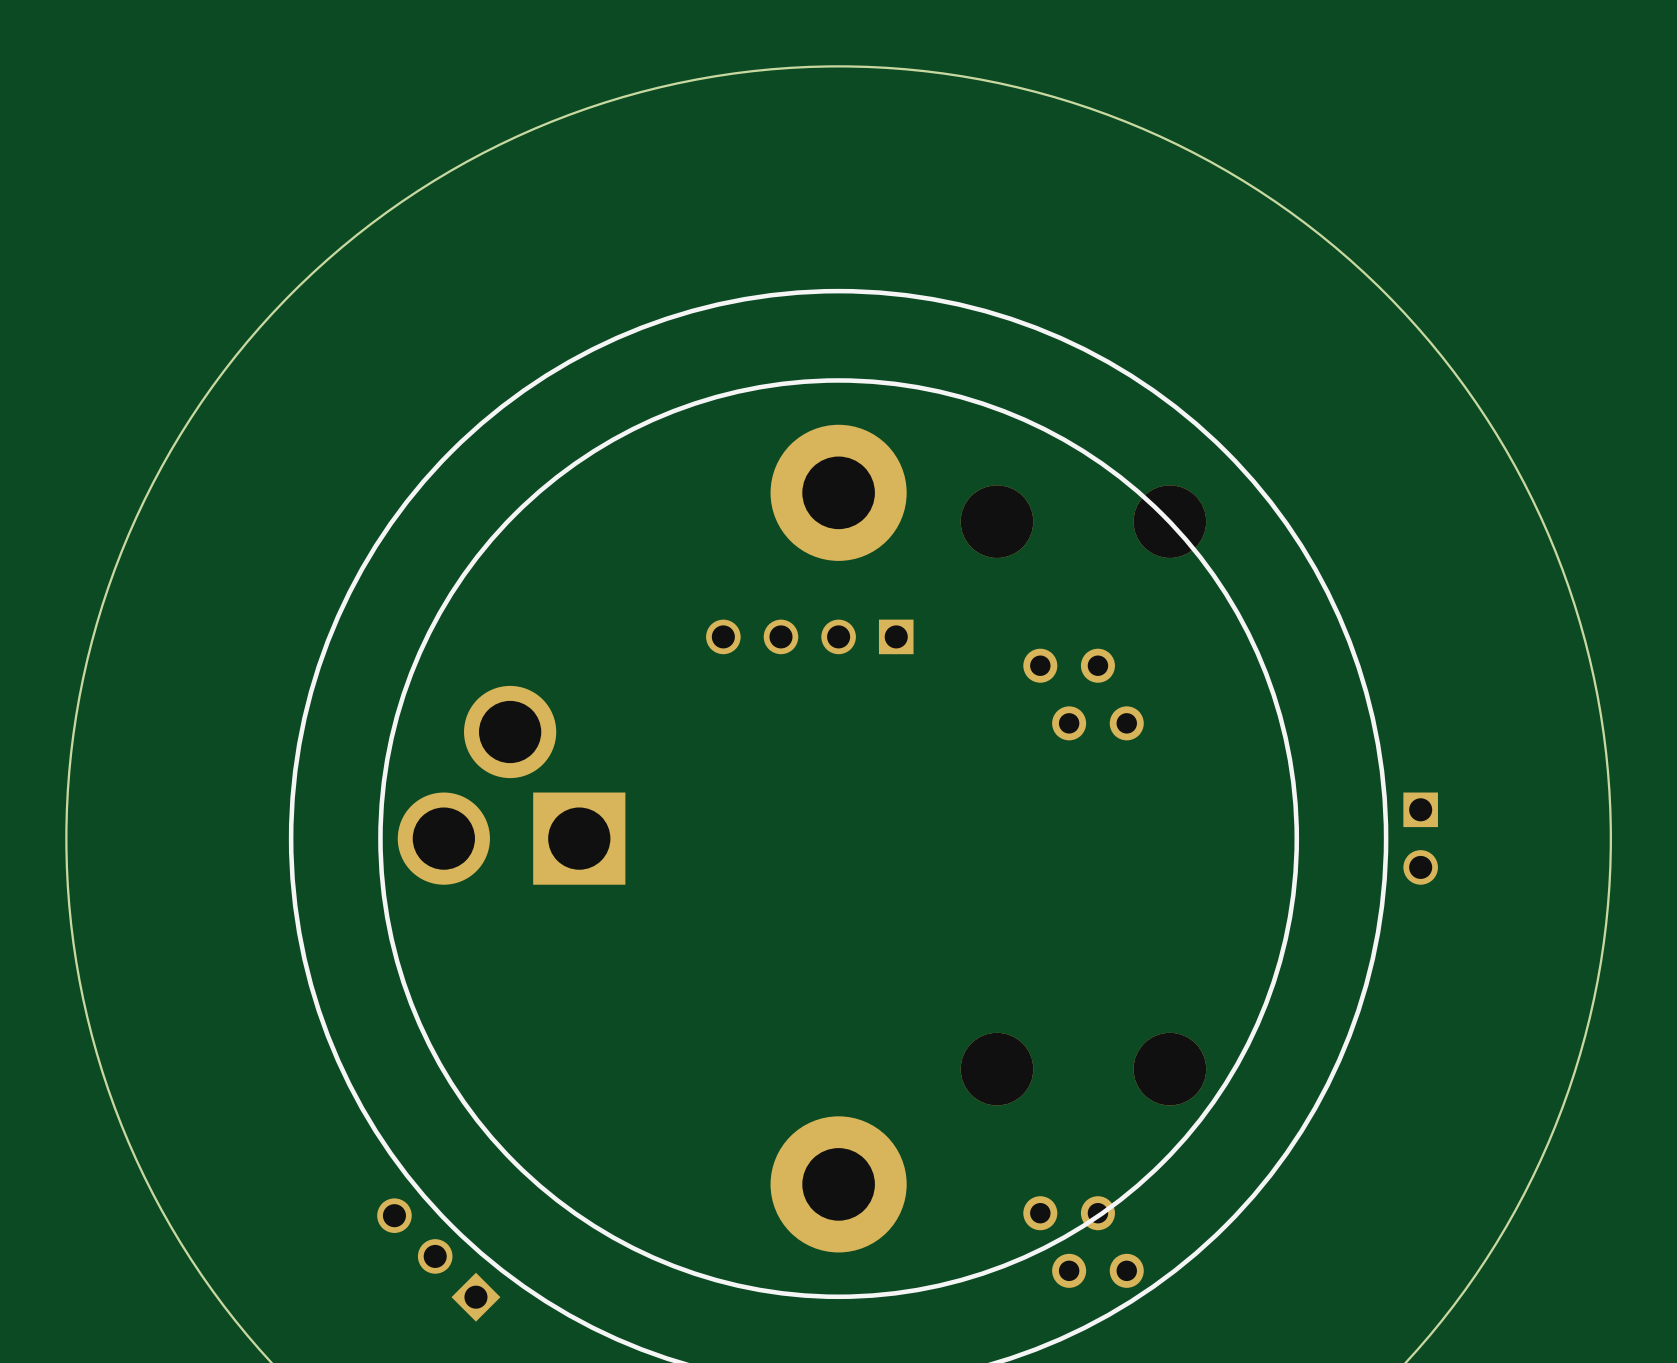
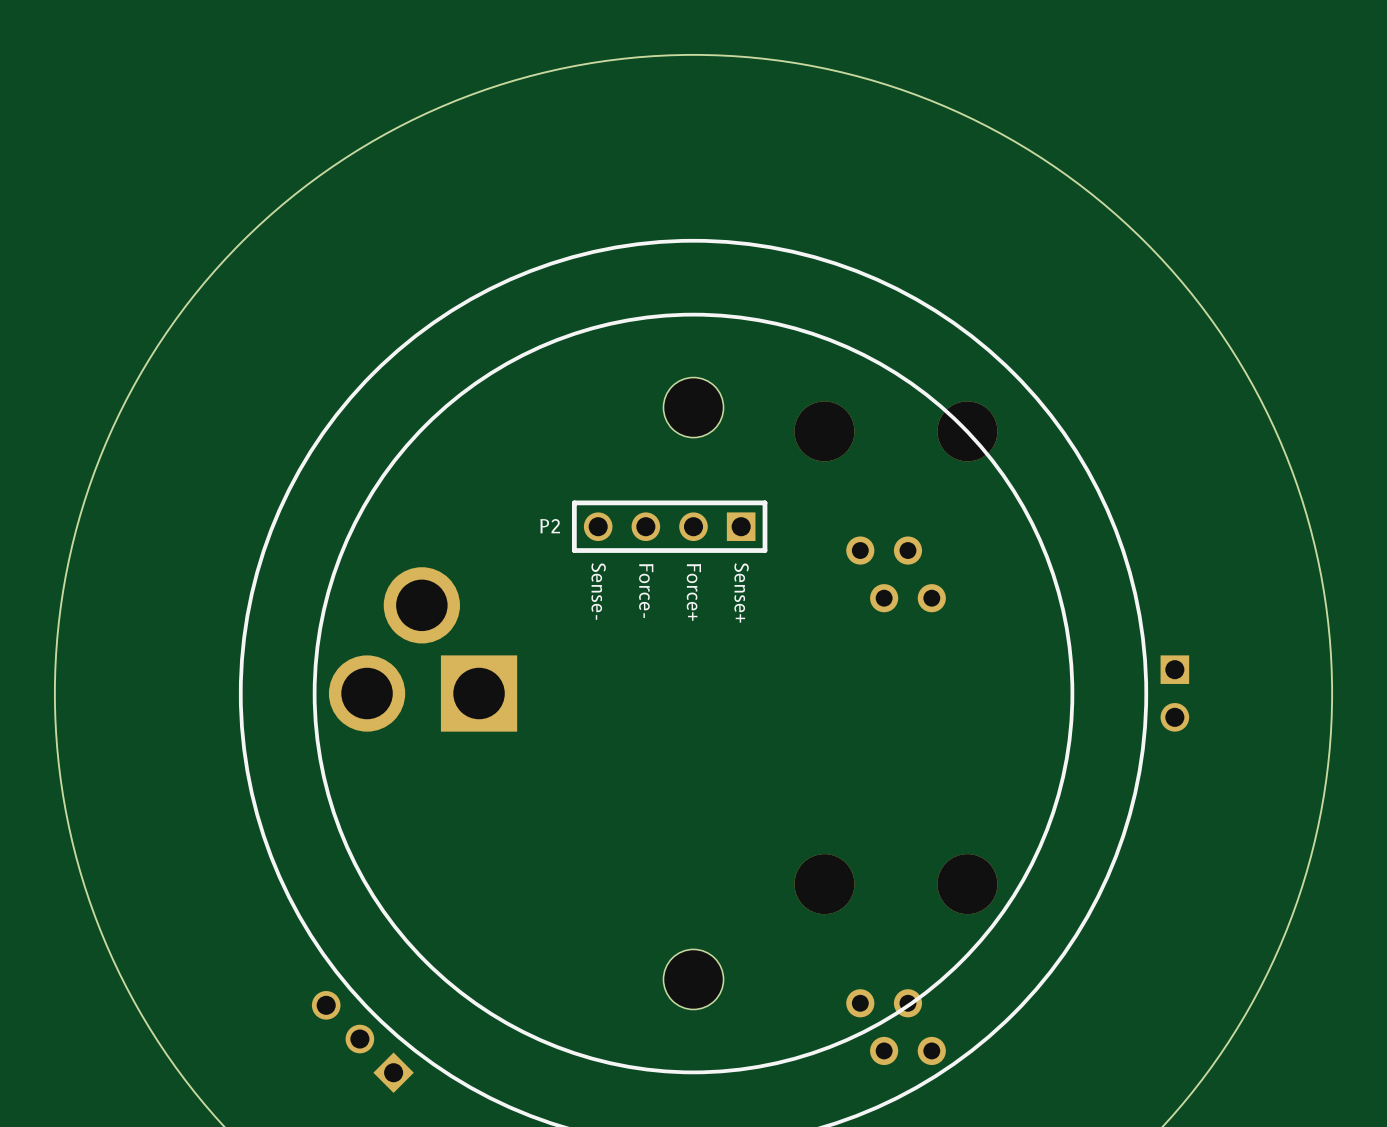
part footprint: [770, 424, 907, 561] -> [663, 377, 724, 438]
P2 side: top (809, 636) -> bottom (669, 526)
text: none -> Force- (646, 590)
text: none -> Sense- (598, 591)
text: none -> Force+ (693, 592)
text: none -> Sense+ (741, 592)
part footprint: [770, 1116, 907, 1253] -> [663, 949, 724, 1010]

